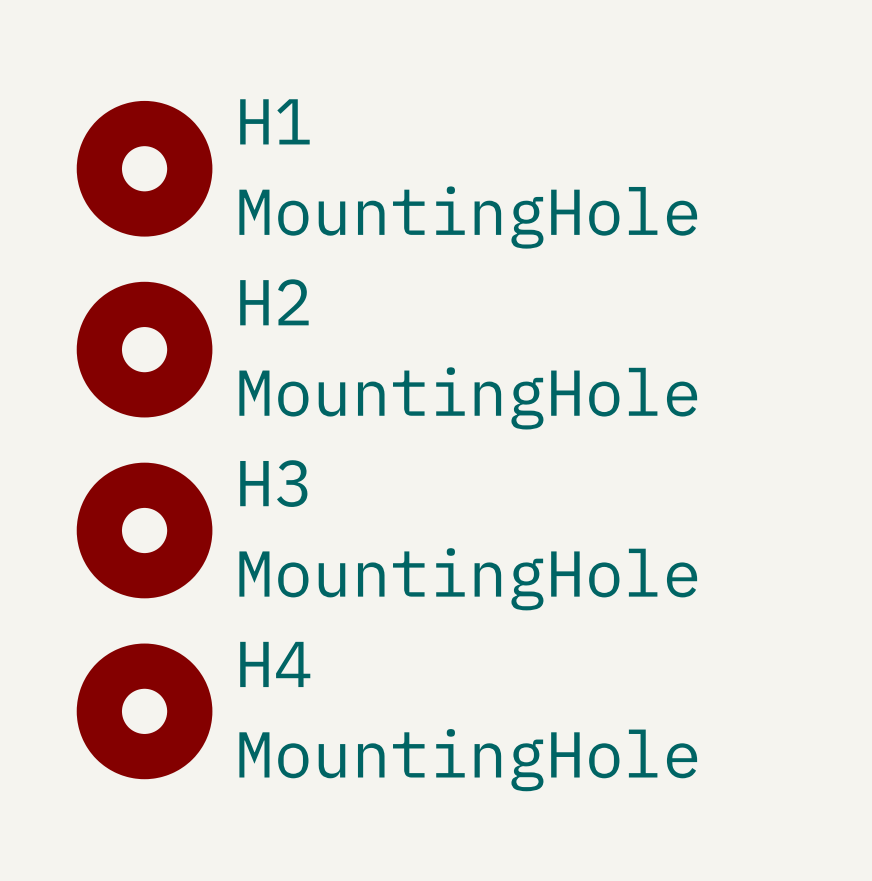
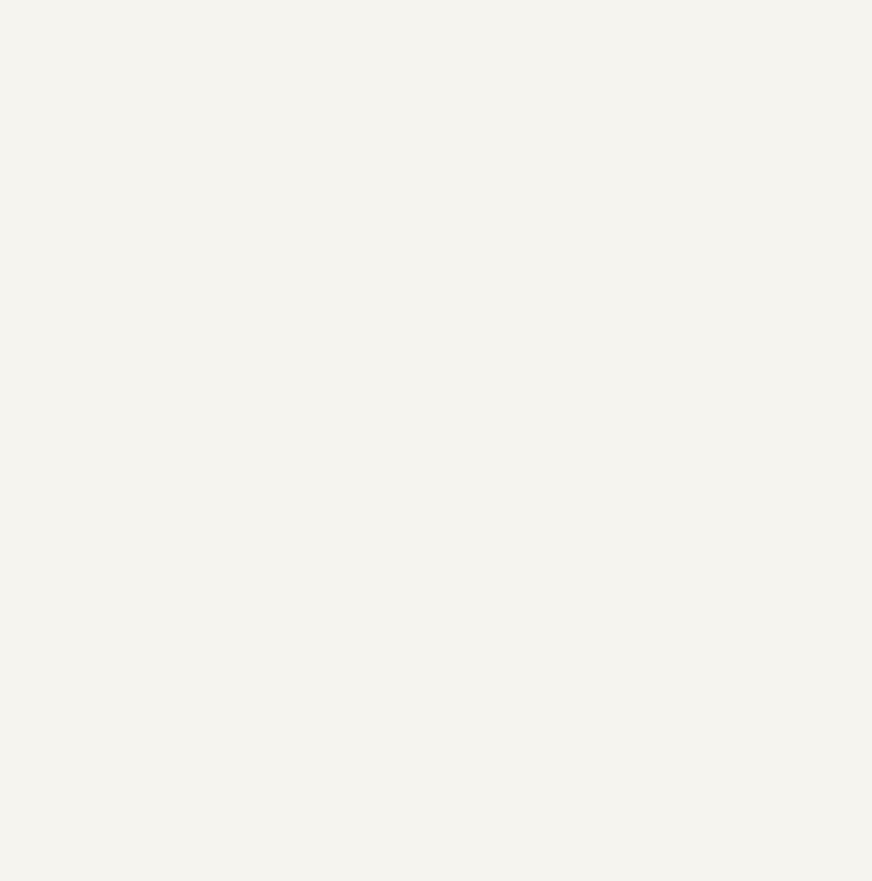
H1: MountingHole (144, 168) -> none
H2: MountingHole (144, 349) -> none
H3: MountingHole (144, 530) -> none
H4: MountingHole (144, 711) -> none

